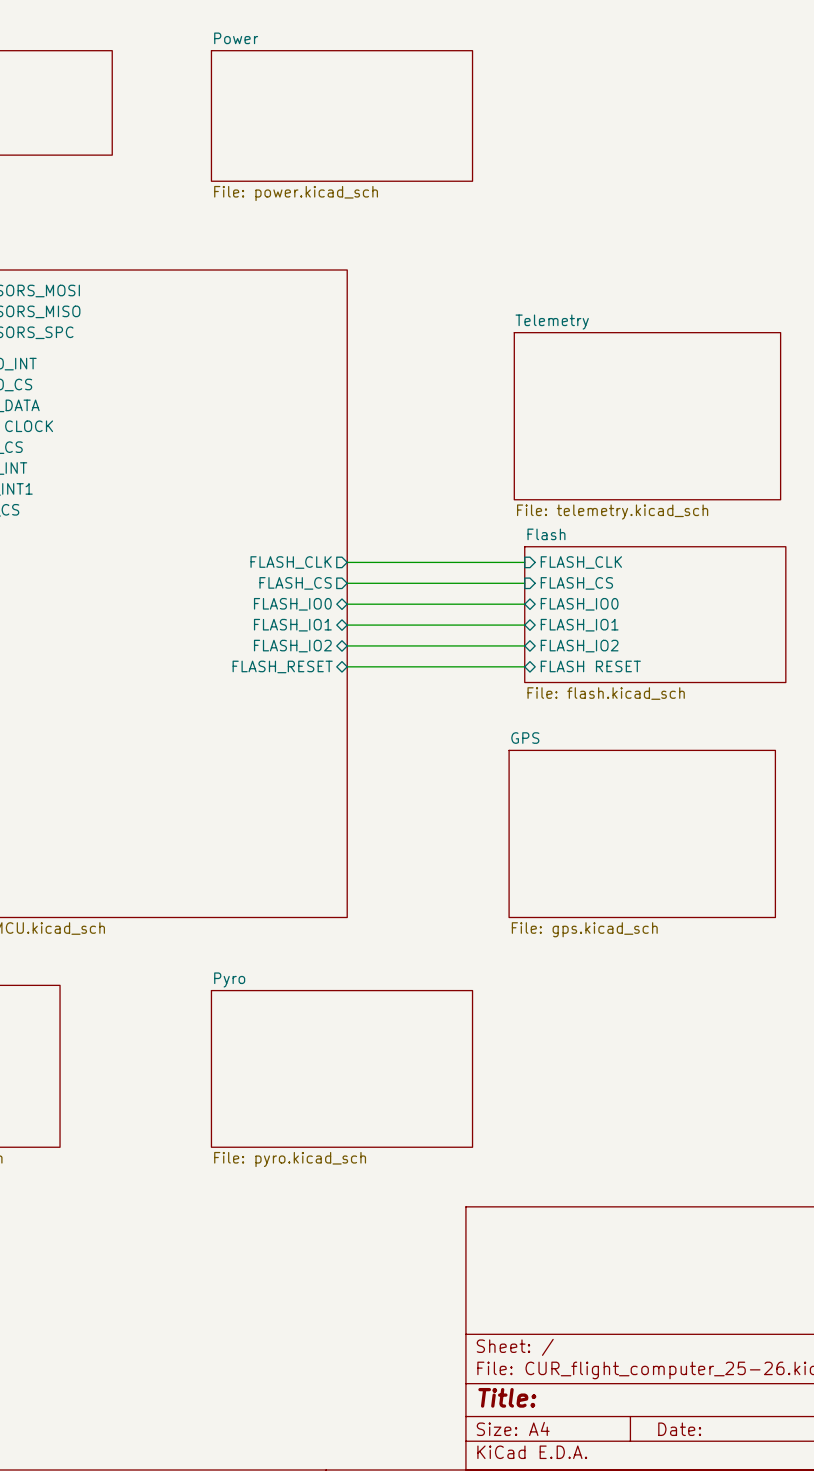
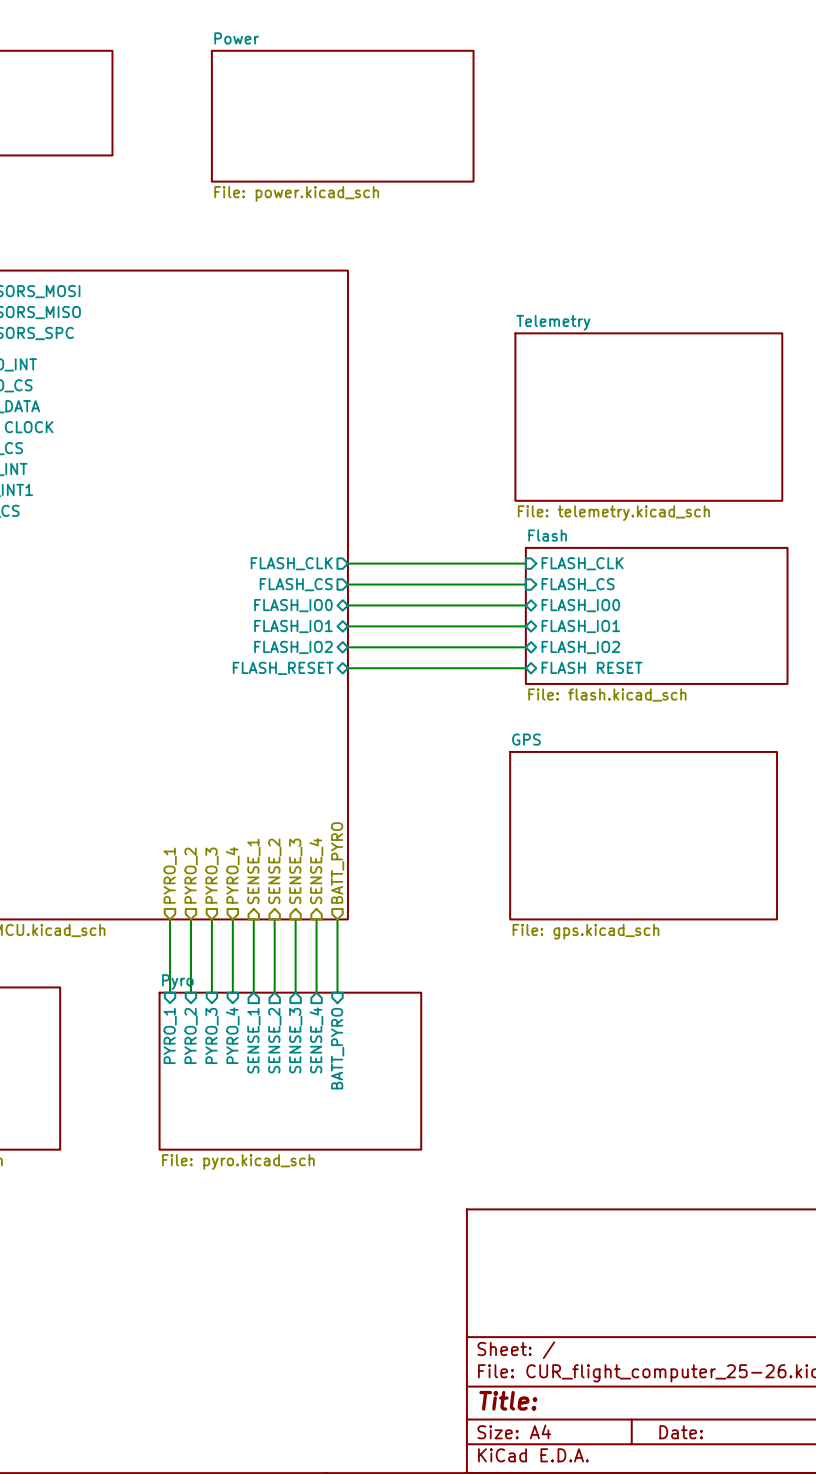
hierarchical label: none -> BATT_PYRO (337, 862)
hierarchical label: none -> SENSE_1 (253, 871)
hierarchical label: none -> SENSE_2 (274, 871)
hierarchical label: none -> SENSE_3 (295, 871)
hierarchical label: none -> SENSE_4 (316, 871)
hierarchical label: none -> PYRO_1 (170, 875)
hierarchical label: none -> PYRO_2 (191, 875)
hierarchical label: none -> PYRO_3 (212, 875)
hierarchical label: none -> PYRO_4 (232, 875)
wire: none -> (170, 919) (170, 992)
wire: none -> (190, 919) (190, 992)
wire: none -> (211, 919) (211, 992)
wire: none -> (232, 919) (232, 992)
wire: none -> (253, 919) (253, 992)
wire: none -> (274, 919) (274, 992)
wire: none -> (295, 919) (295, 992)
wire: none -> (316, 919) (316, 992)
wire: none -> (337, 919) (337, 992)
sheet pin: none -> PYRO_1 (170, 1035)
sheet pin: none -> PYRO_2 (191, 1035)
sheet pin: none -> PYRO_3 (212, 1035)
sheet pin: none -> PYRO_4 (232, 1035)
sheet pin: none -> SENSE_1 (253, 1040)
sheet pin: none -> SENSE_2 (274, 1040)
sheet pin: none -> SENSE_3 (295, 1040)
sheet pin: none -> SENSE_4 (316, 1040)
sheet pin: none -> BATT_PYRO (337, 1048)
sheet Pyro position: (341, 1068) -> (290, 1071)

